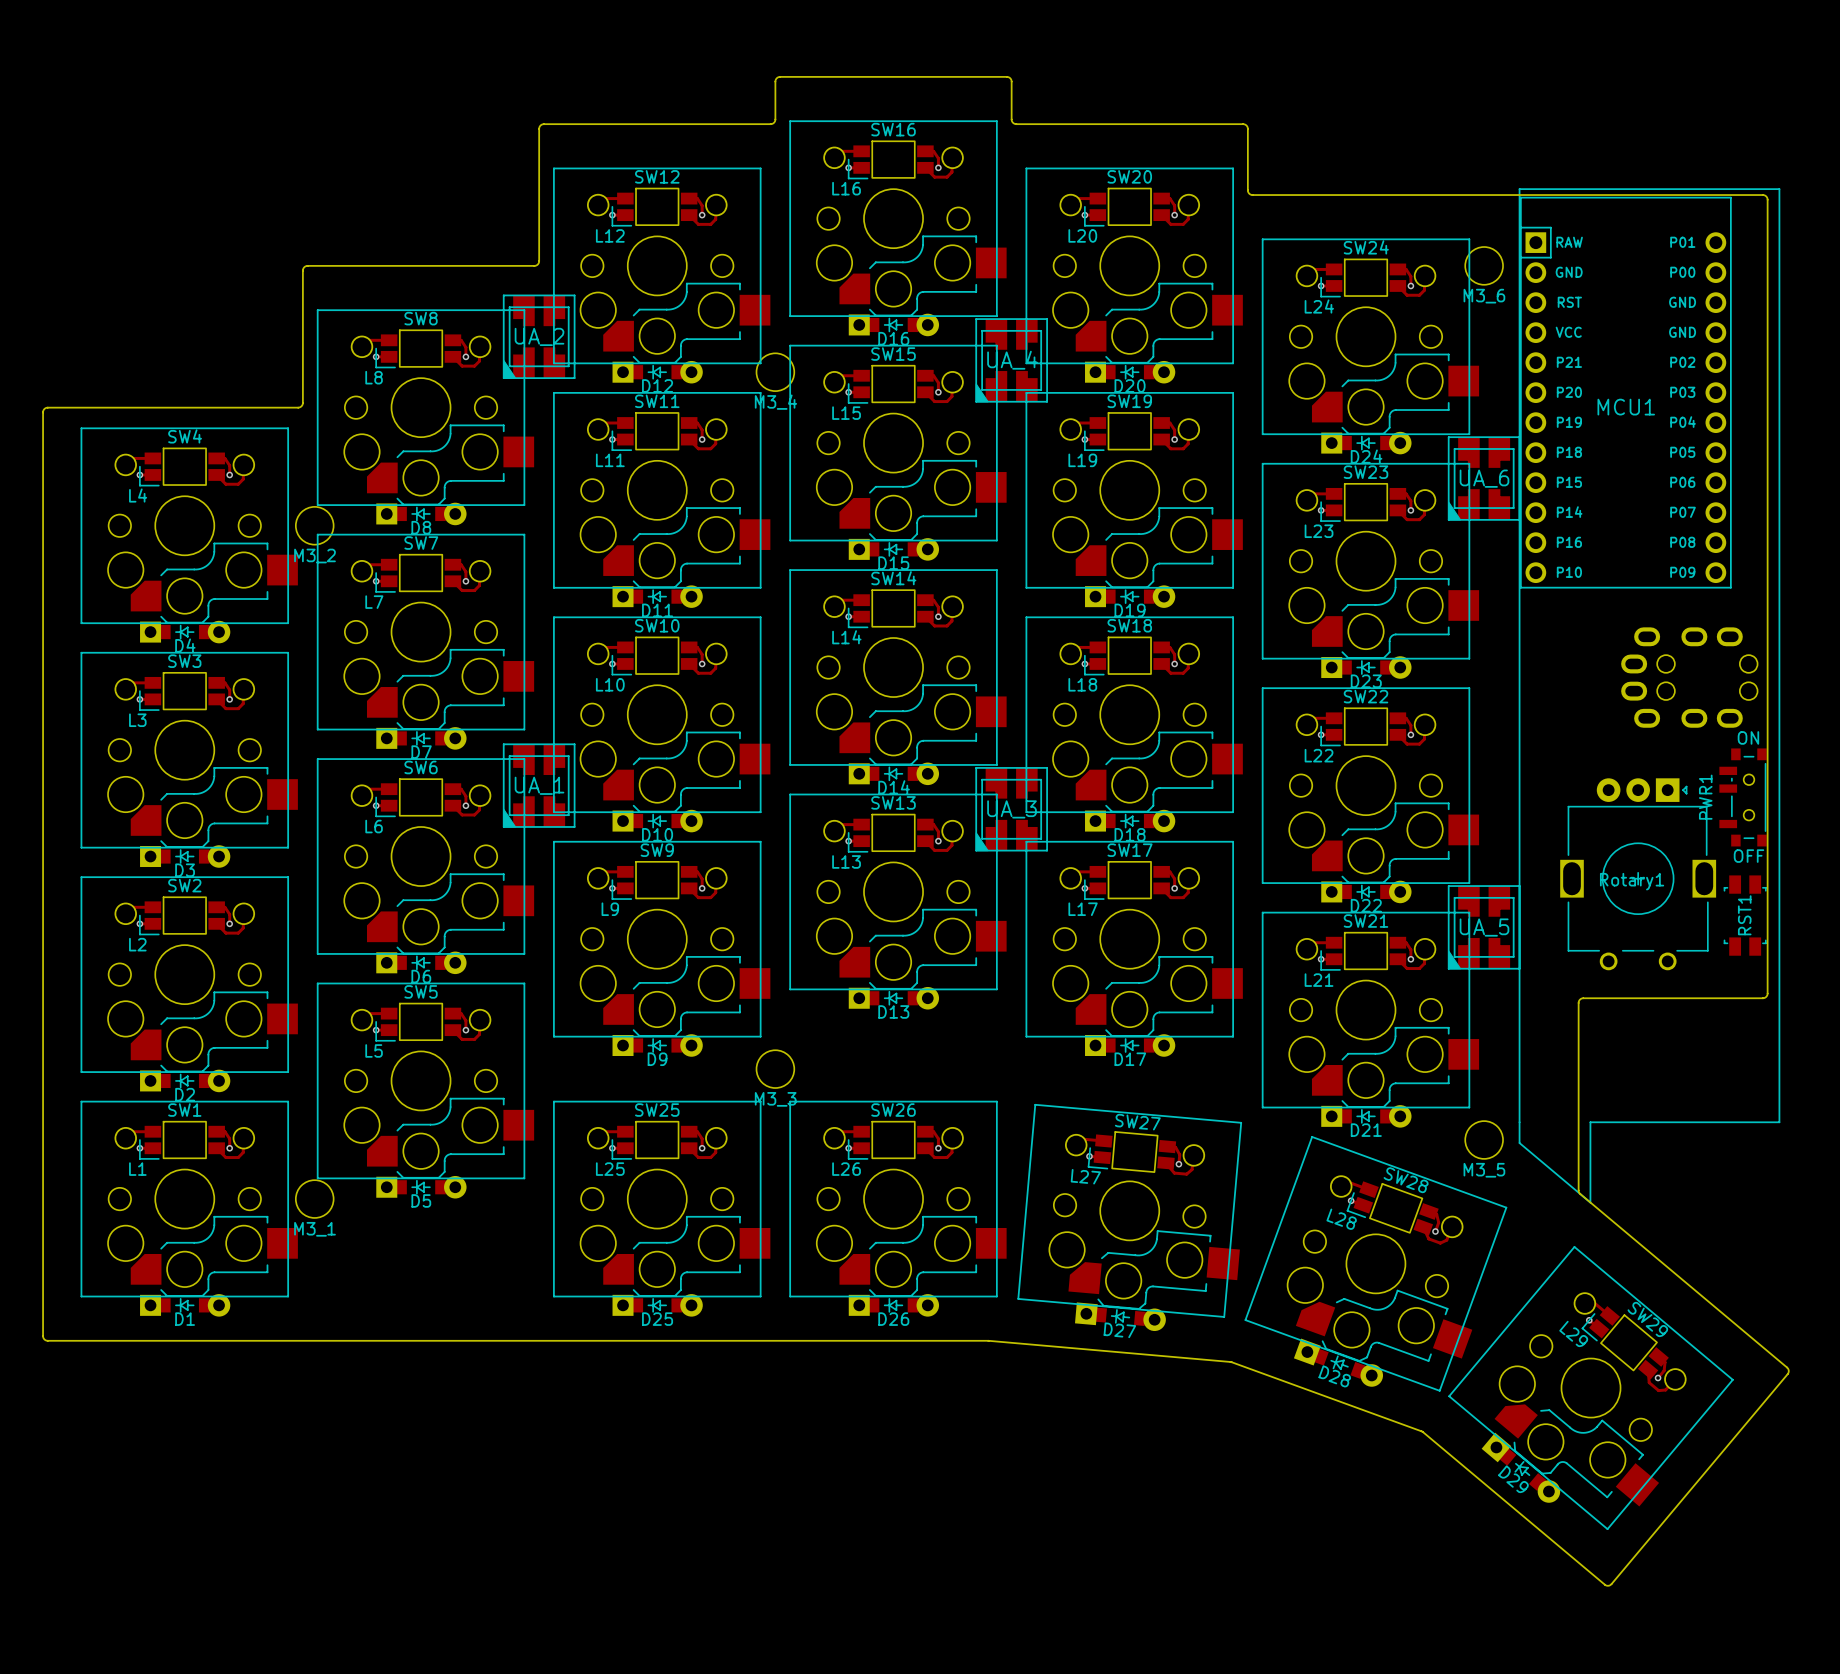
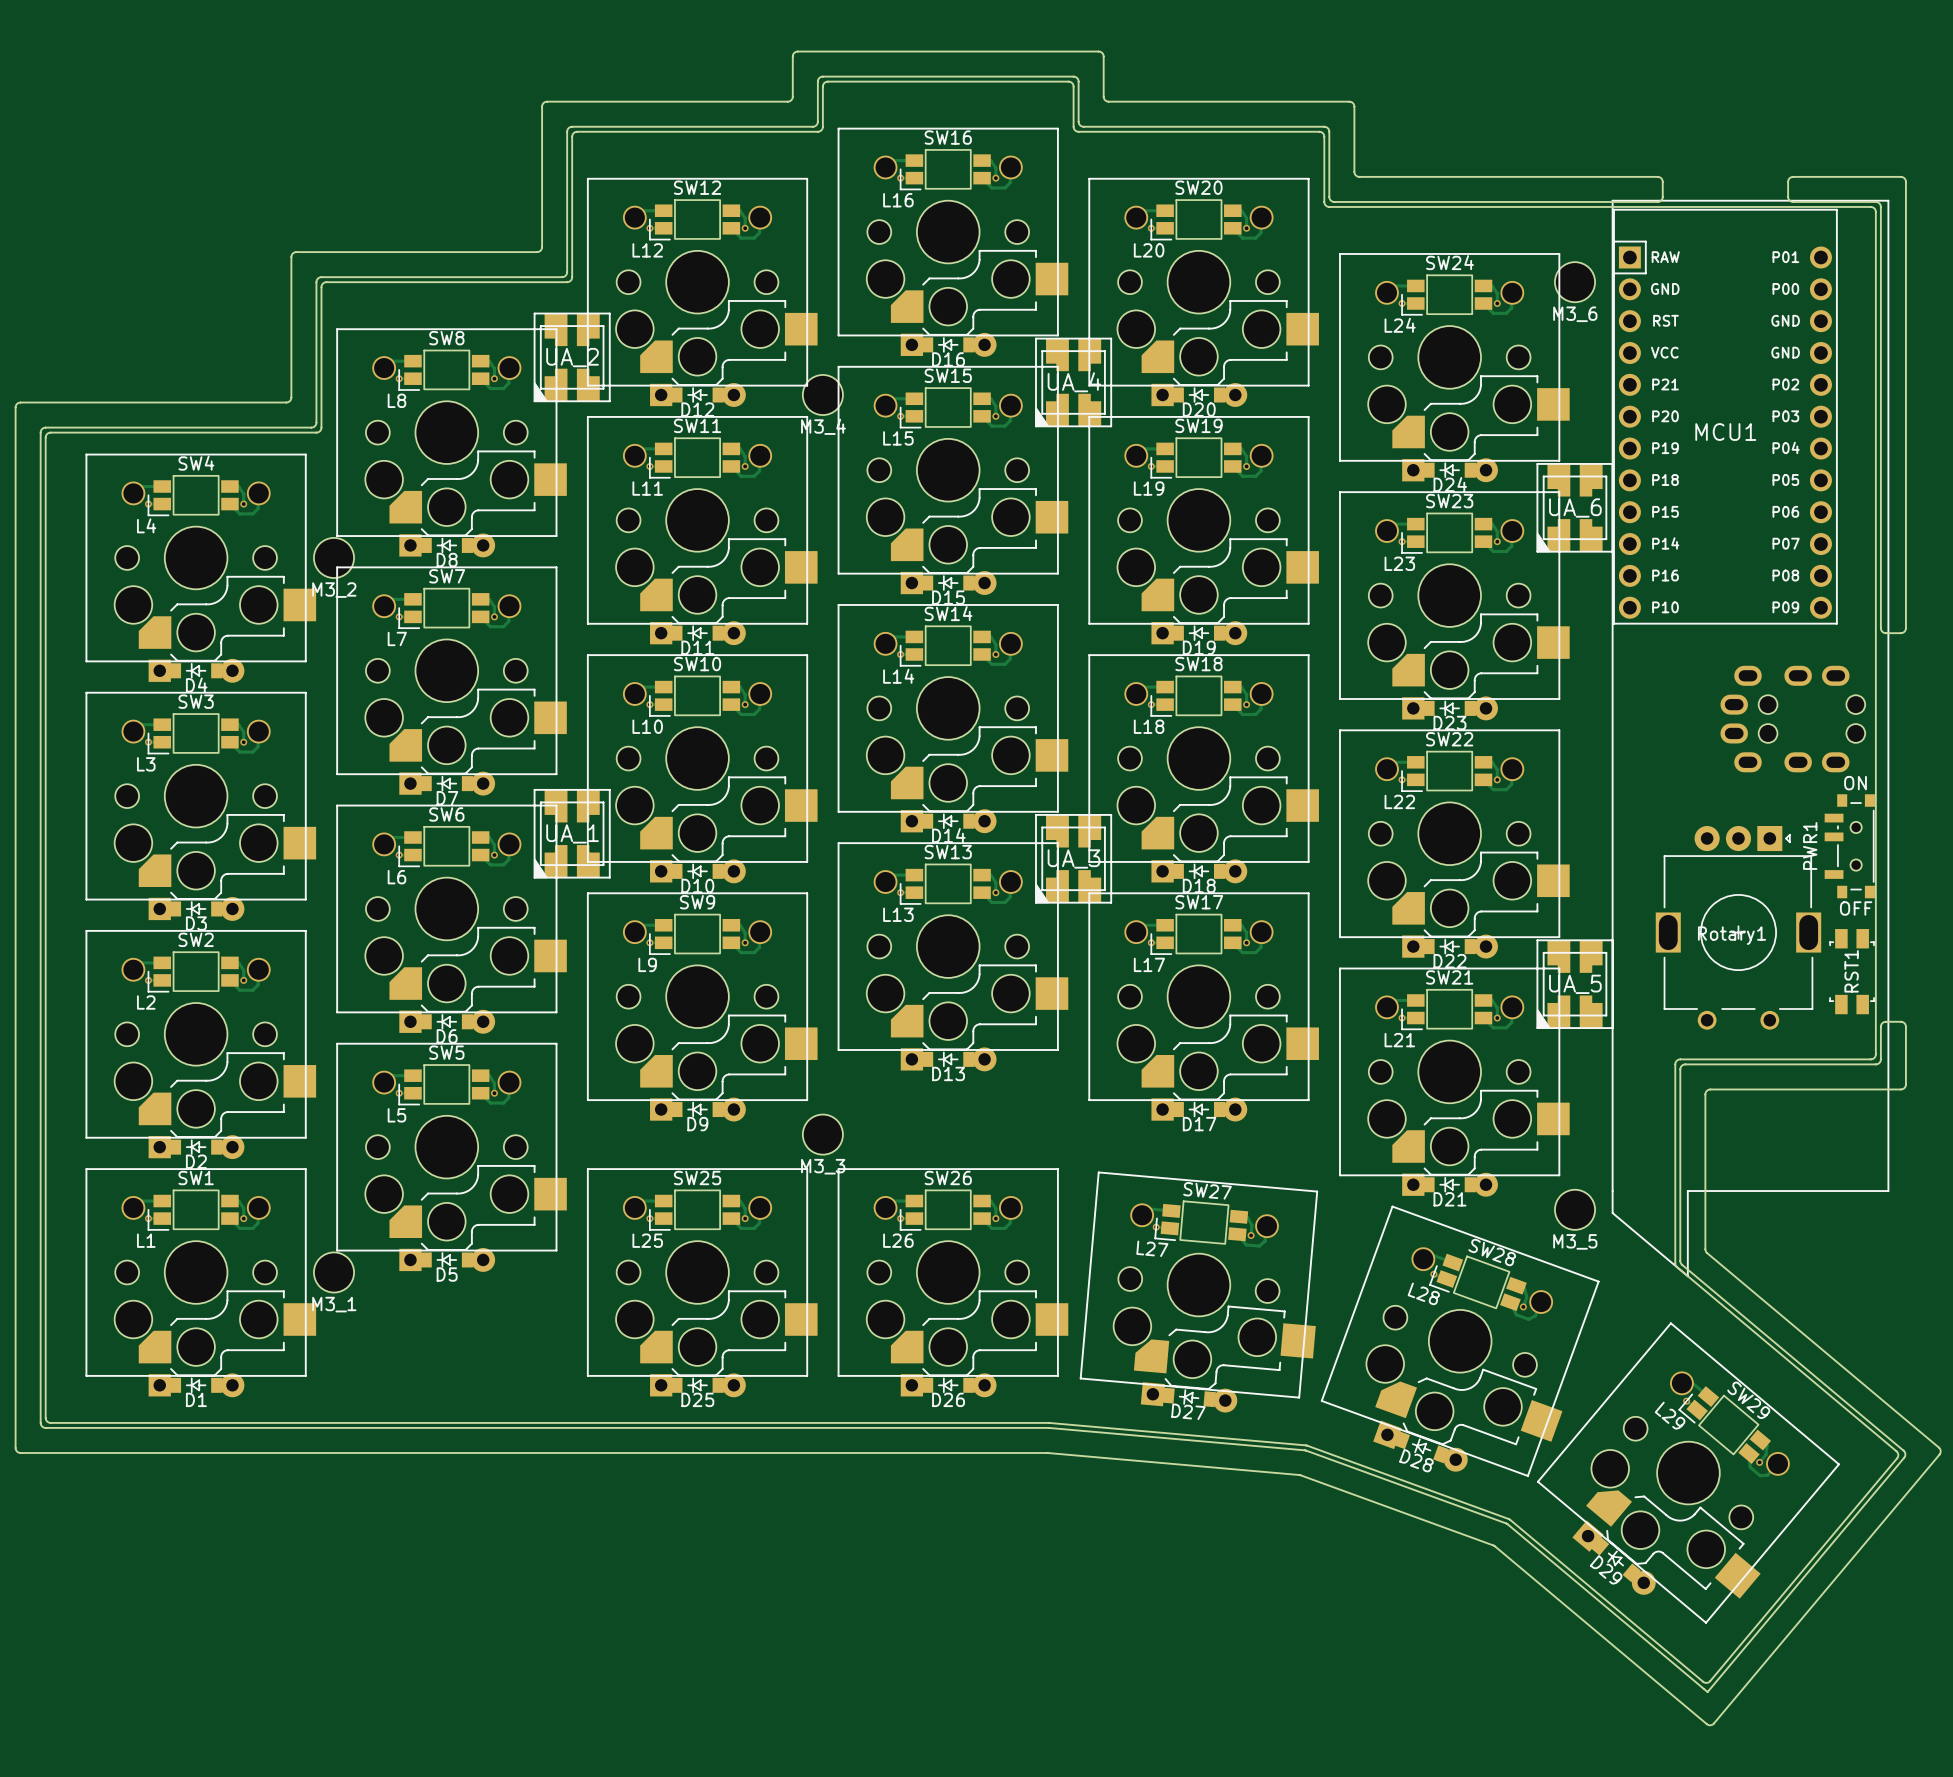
board edge: none -> (797, 51) (1099, 51) (1103, 55) (1103, 97) (1107, 101) (1351, 102) (1354, 106) (1354, 172) (1358, 176) (1658, 176) (1662, 180) (1662, 197) (1657, 201) (1333, 201) (1329, 197) (1329, 131) (1325, 126) (1082, 126) (1078, 122) (1078, 80) (1074, 76) (822, 76) (817, 80) (817, 122) (814, 126) (569, 127) (567, 131) (567, 272) (564, 276) (318, 278) (316, 282) (316, 422) (313, 427) (42, 428) (40, 432) (41, 1425) (45, 1427) (1048, 1427) (1305, 1450) (1506, 1523) (1707, 1692) (1905, 1454) (1681, 1263) (1680, 1068) (1685, 1064) (1877, 1064) (1880, 1060) (1881, 1024) (1885, 1021) (1902, 1021) (1905, 1026) (1905, 1084) (1902, 1089) (1710, 1089) (1705, 1093) (1706, 1251) (1938, 1447) (1940, 1451) (1712, 1724) (1706, 1724) (1494, 1545) (1300, 1475) (1047, 1453) (20, 1453) (16, 1450) (16, 405) (20, 402) (288, 402) (291, 397) (291, 257) (293, 253) (538, 251) (542, 247) (542, 106) (544, 102) (789, 101) (792, 97) (792, 55) (797, 51)
board edge: none -> (1793, 176) (1900, 176) (1905, 180) (1905, 628) (1902, 633) (1884, 633) (1880, 628) (1880, 205) (1875, 201) (1791, 201) (1788, 197) (1788, 181) (1793, 176)

